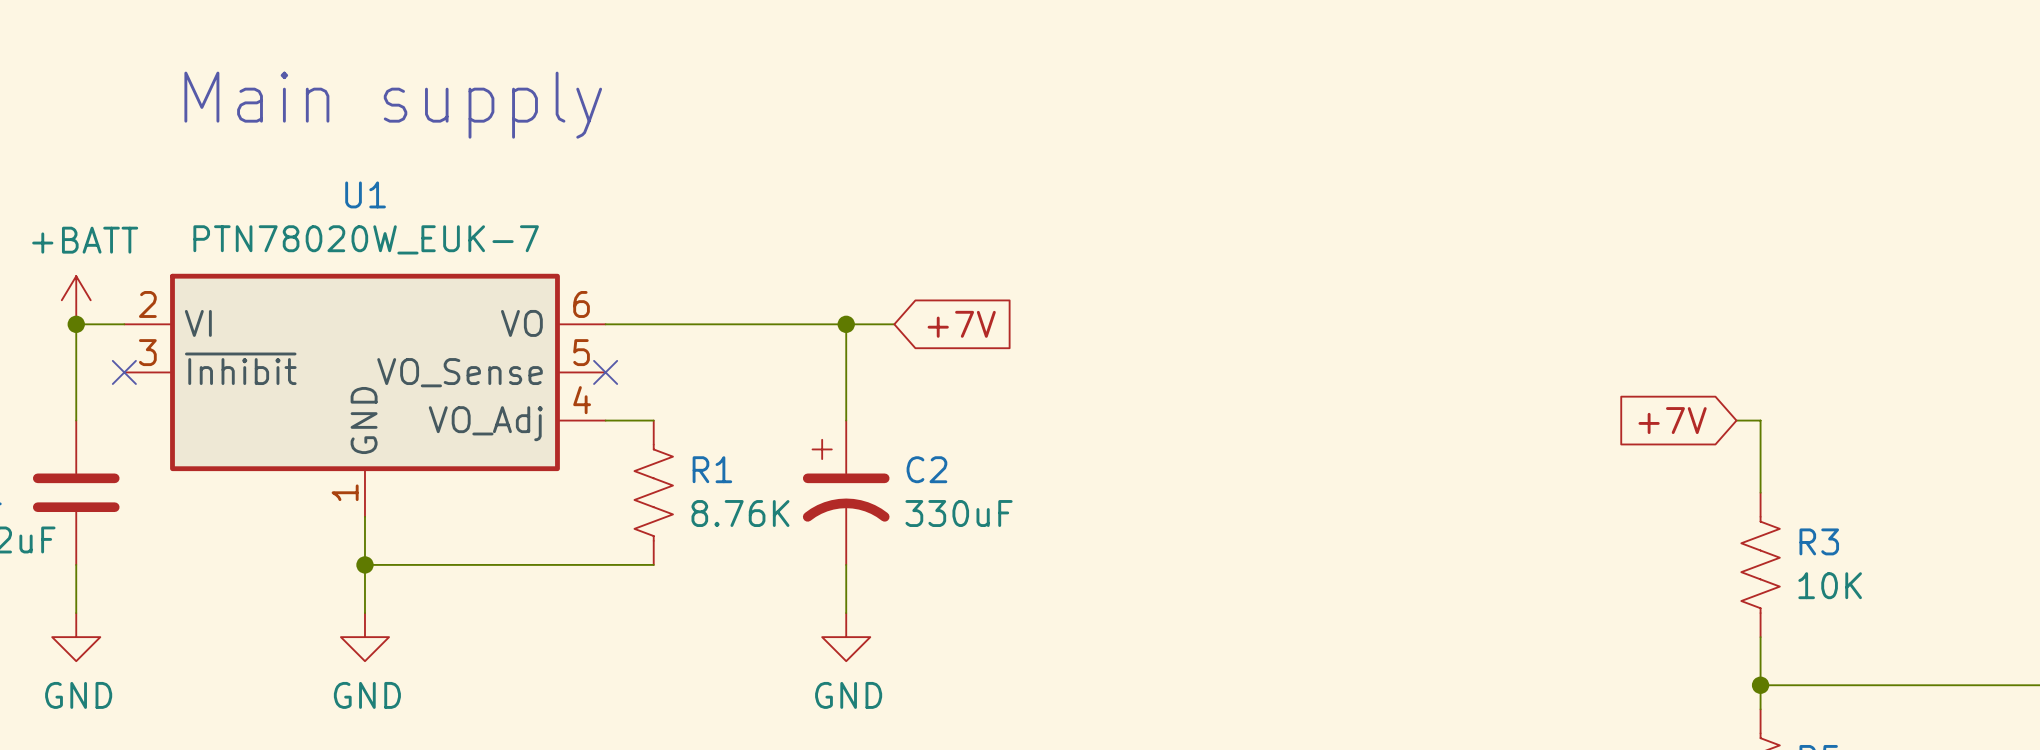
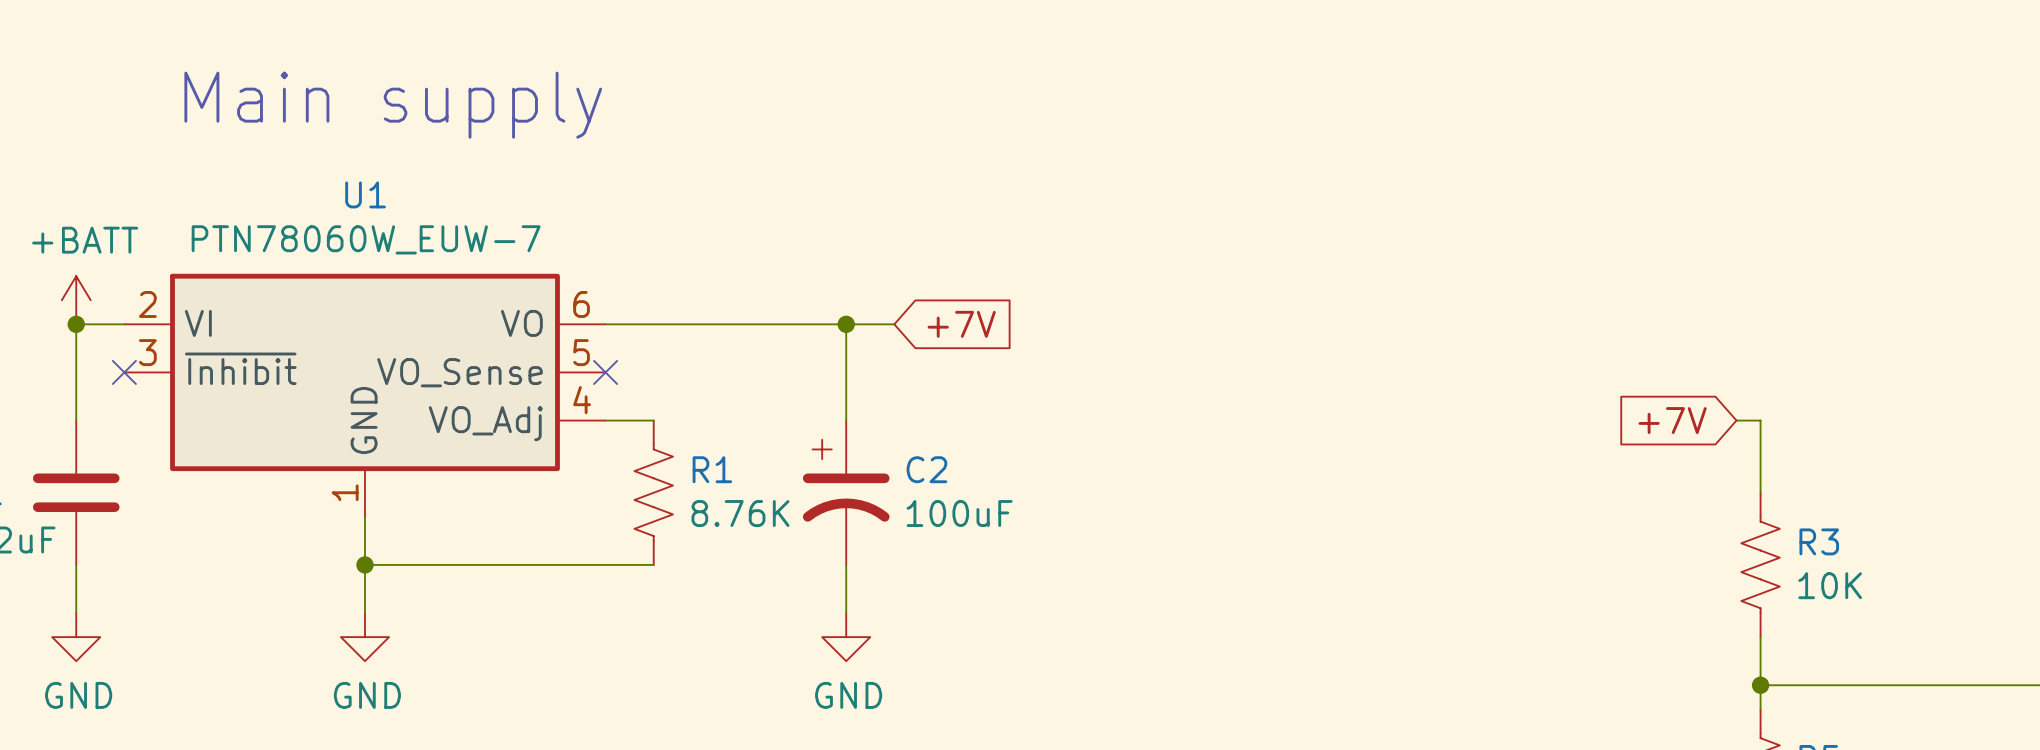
U1 value: PTN78020W_EUK-7 (366, 239) -> PTN78060W_EUW-7 (366, 239)
C2 value: 330uF (959, 513) -> 100uF (959, 513)

